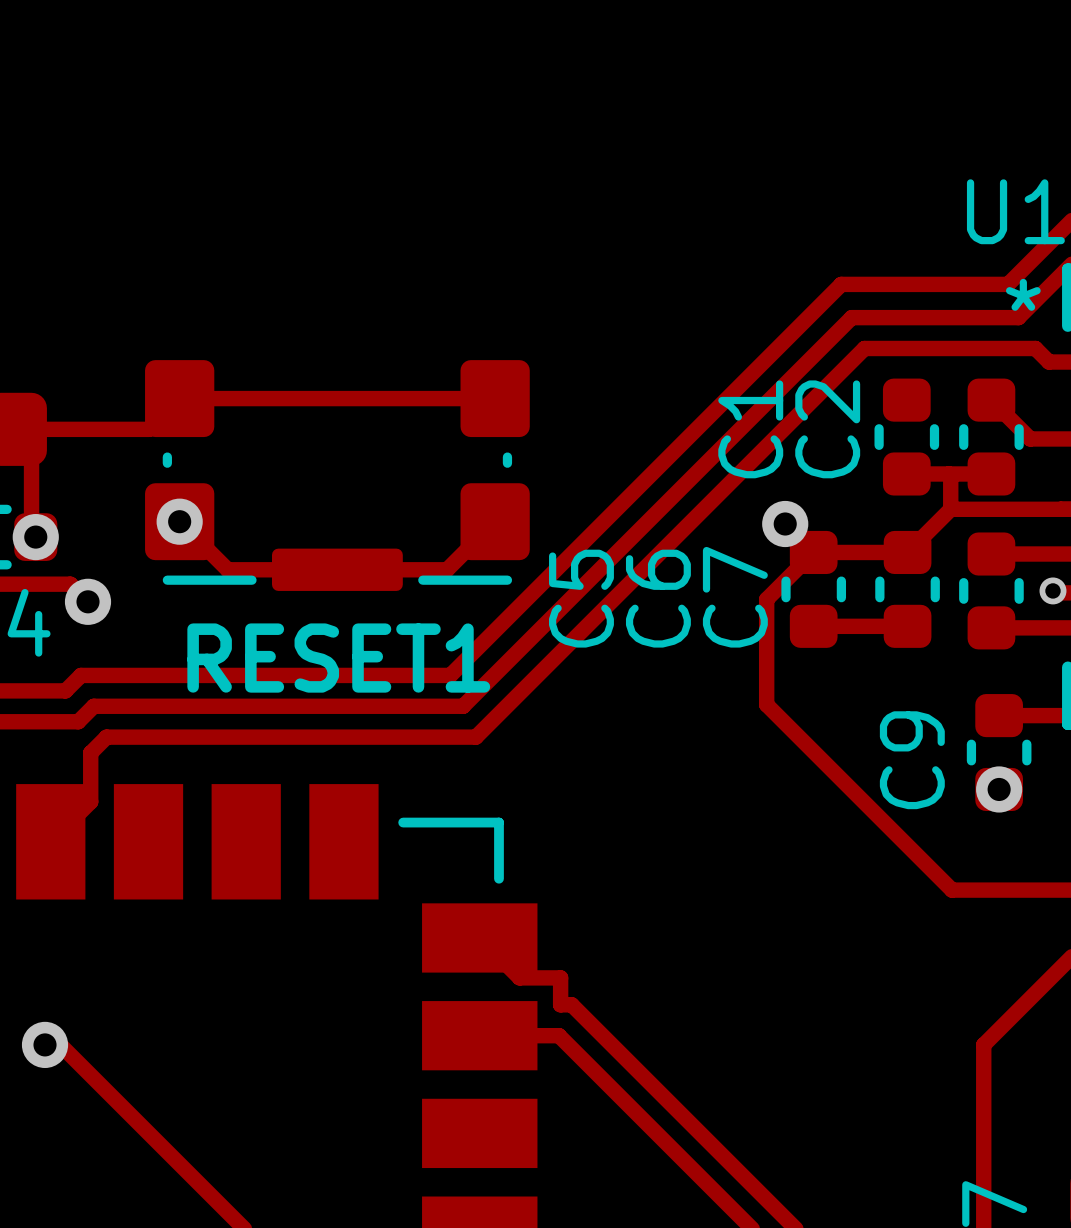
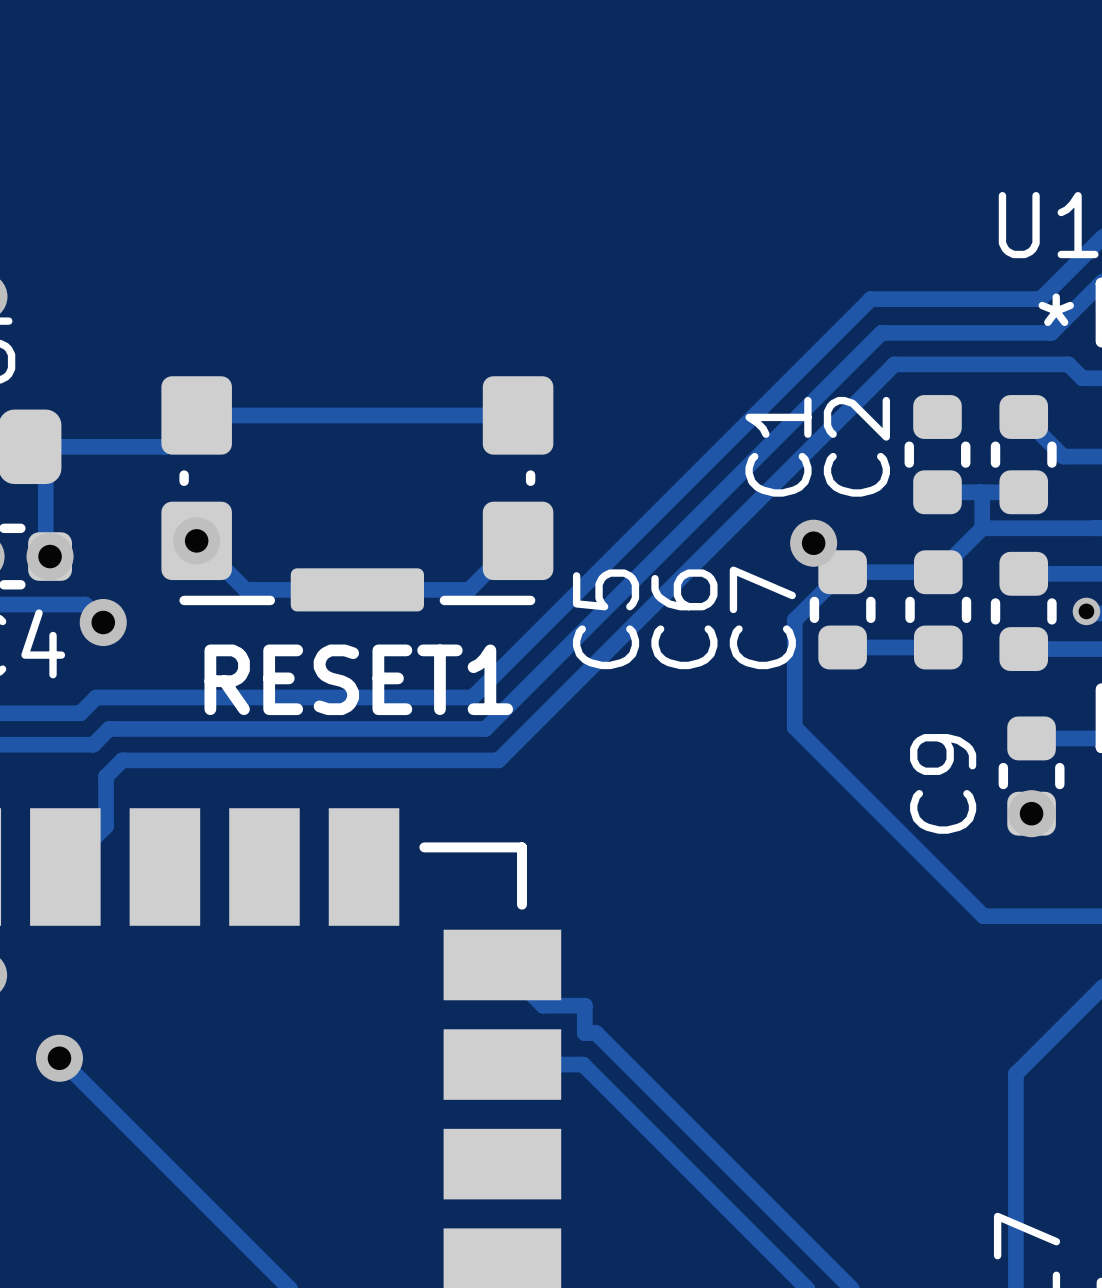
via position: (45, 1044) -> (59, 1058)

